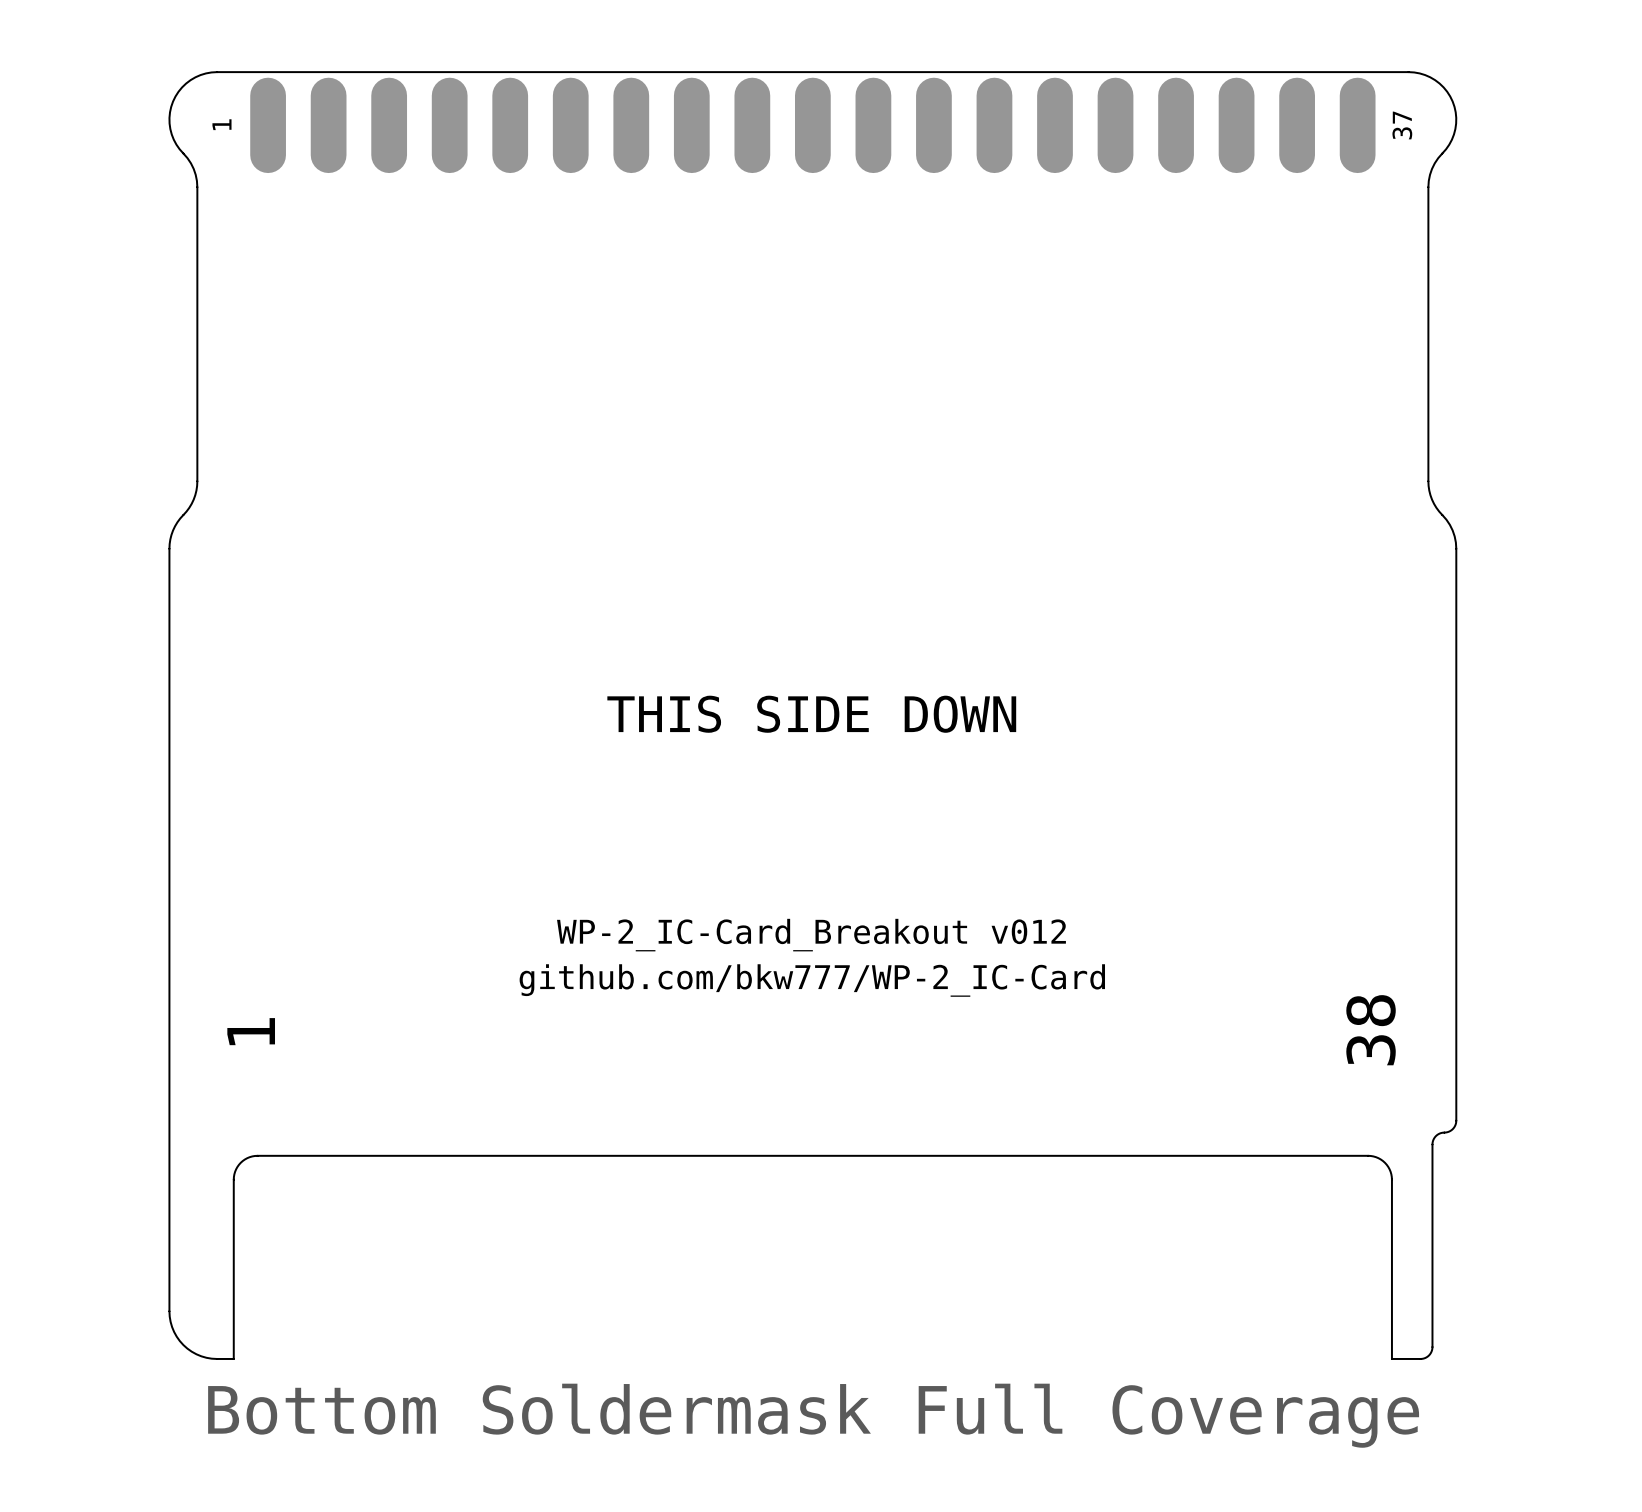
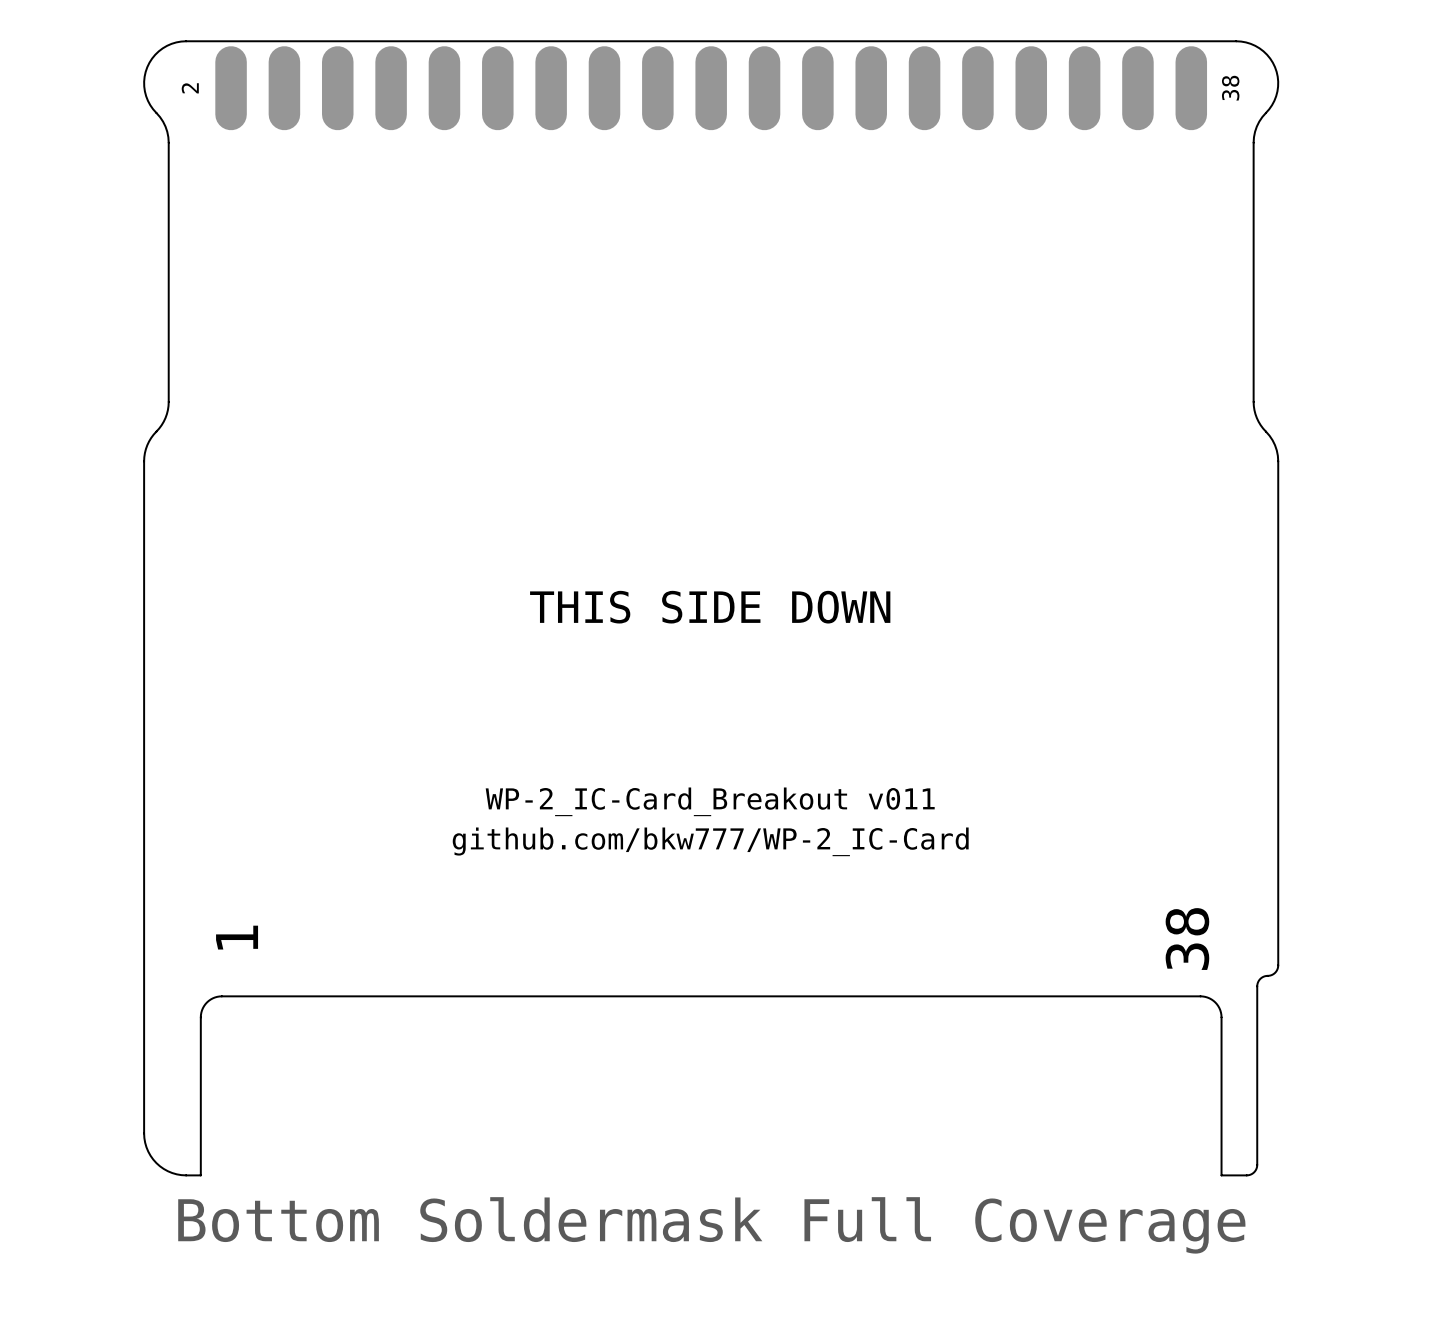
text: 1 (221, 124) -> 2 (190, 88)
text: 37 (1402, 125) -> 38 (1230, 88)
text: WP-2_IC-Card_Breakout v012 (811, 935) -> WP-2_IC-Card_Breakout v011 (710, 801)
text position: 38 (1371, 1030) -> 38 (1187, 939)
text position: 1 (251, 1031) -> 1 (237, 937)

